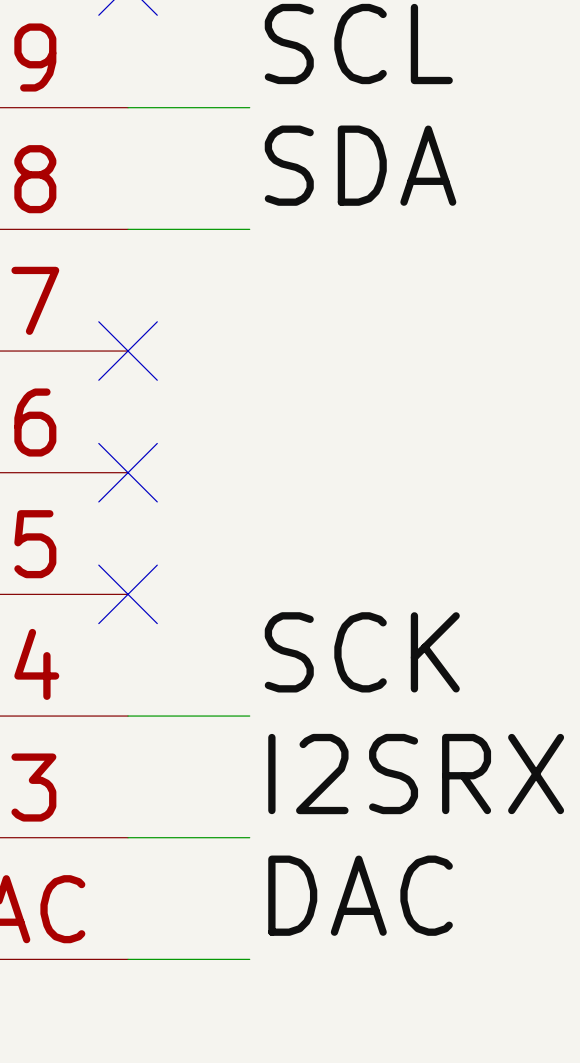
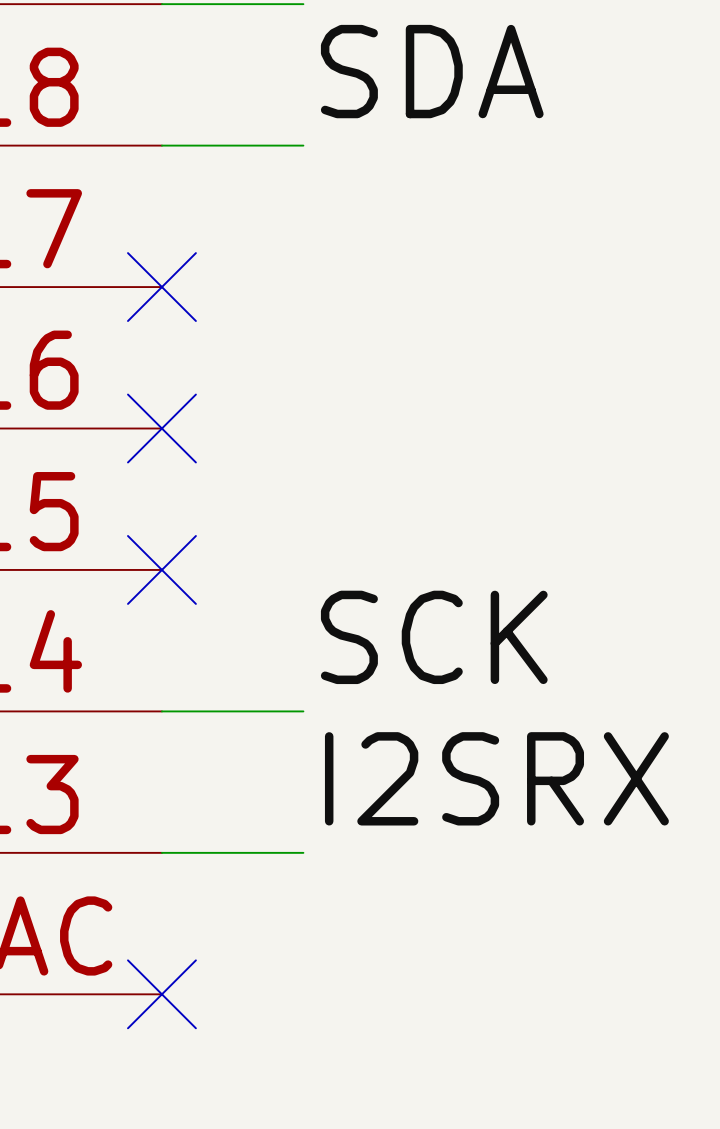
label: DAC (360, 895) -> none
wire: (128, 959) (249, 959) -> none
no-connect mark: none -> (161, 994)

